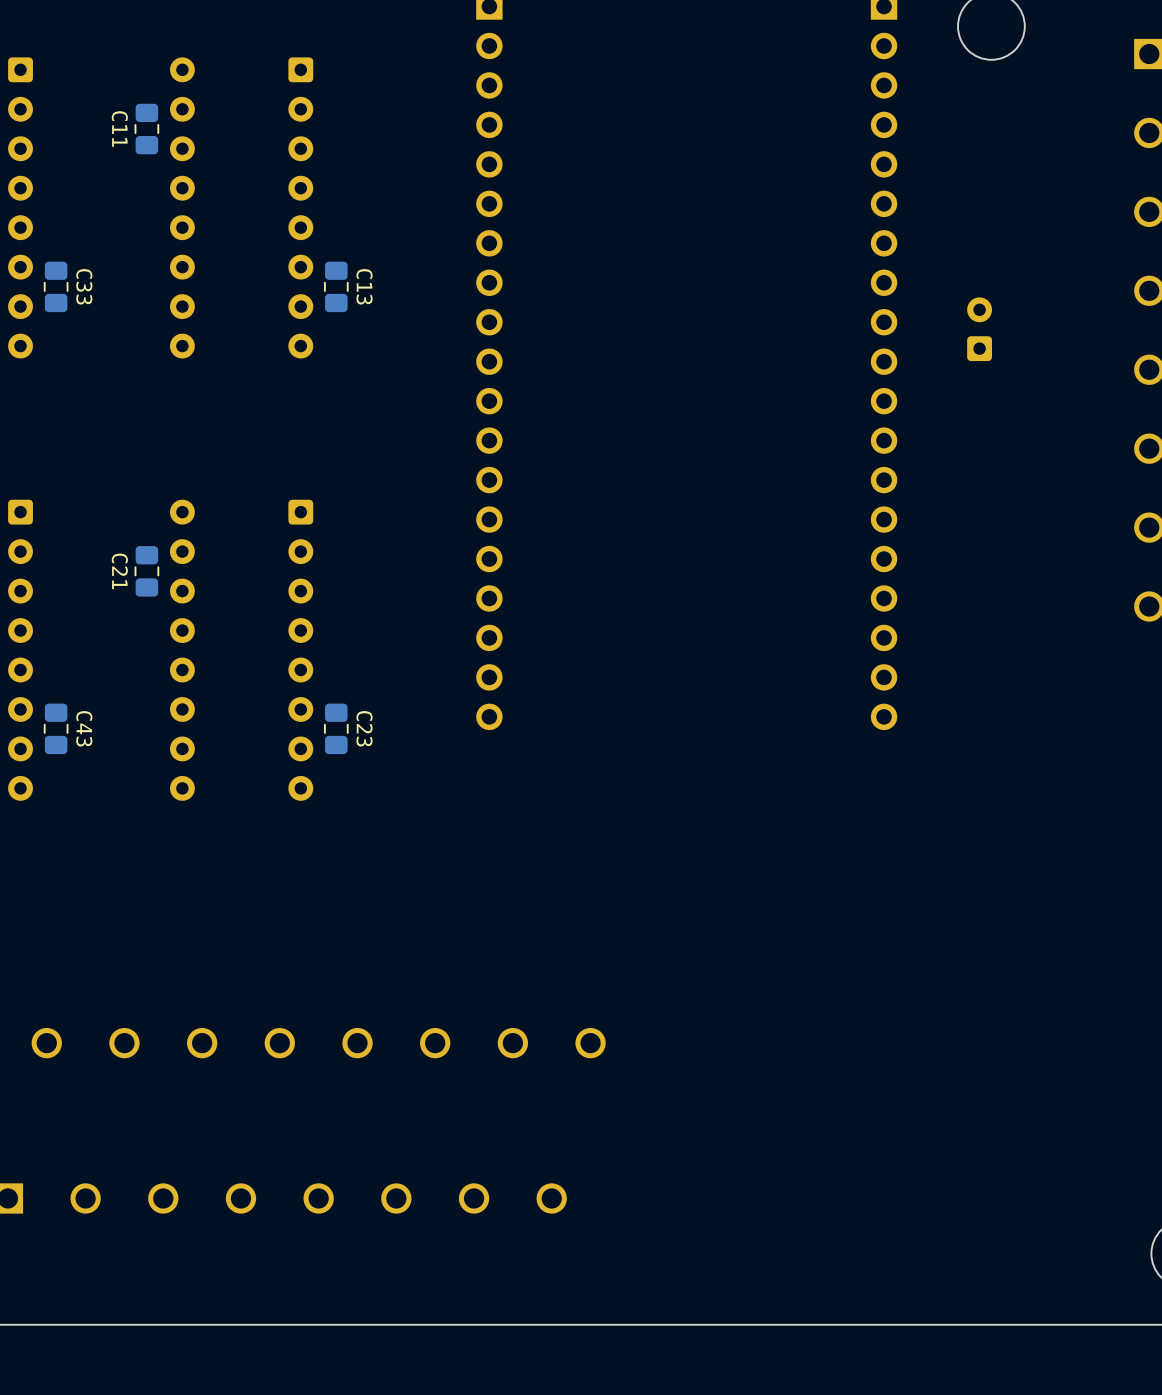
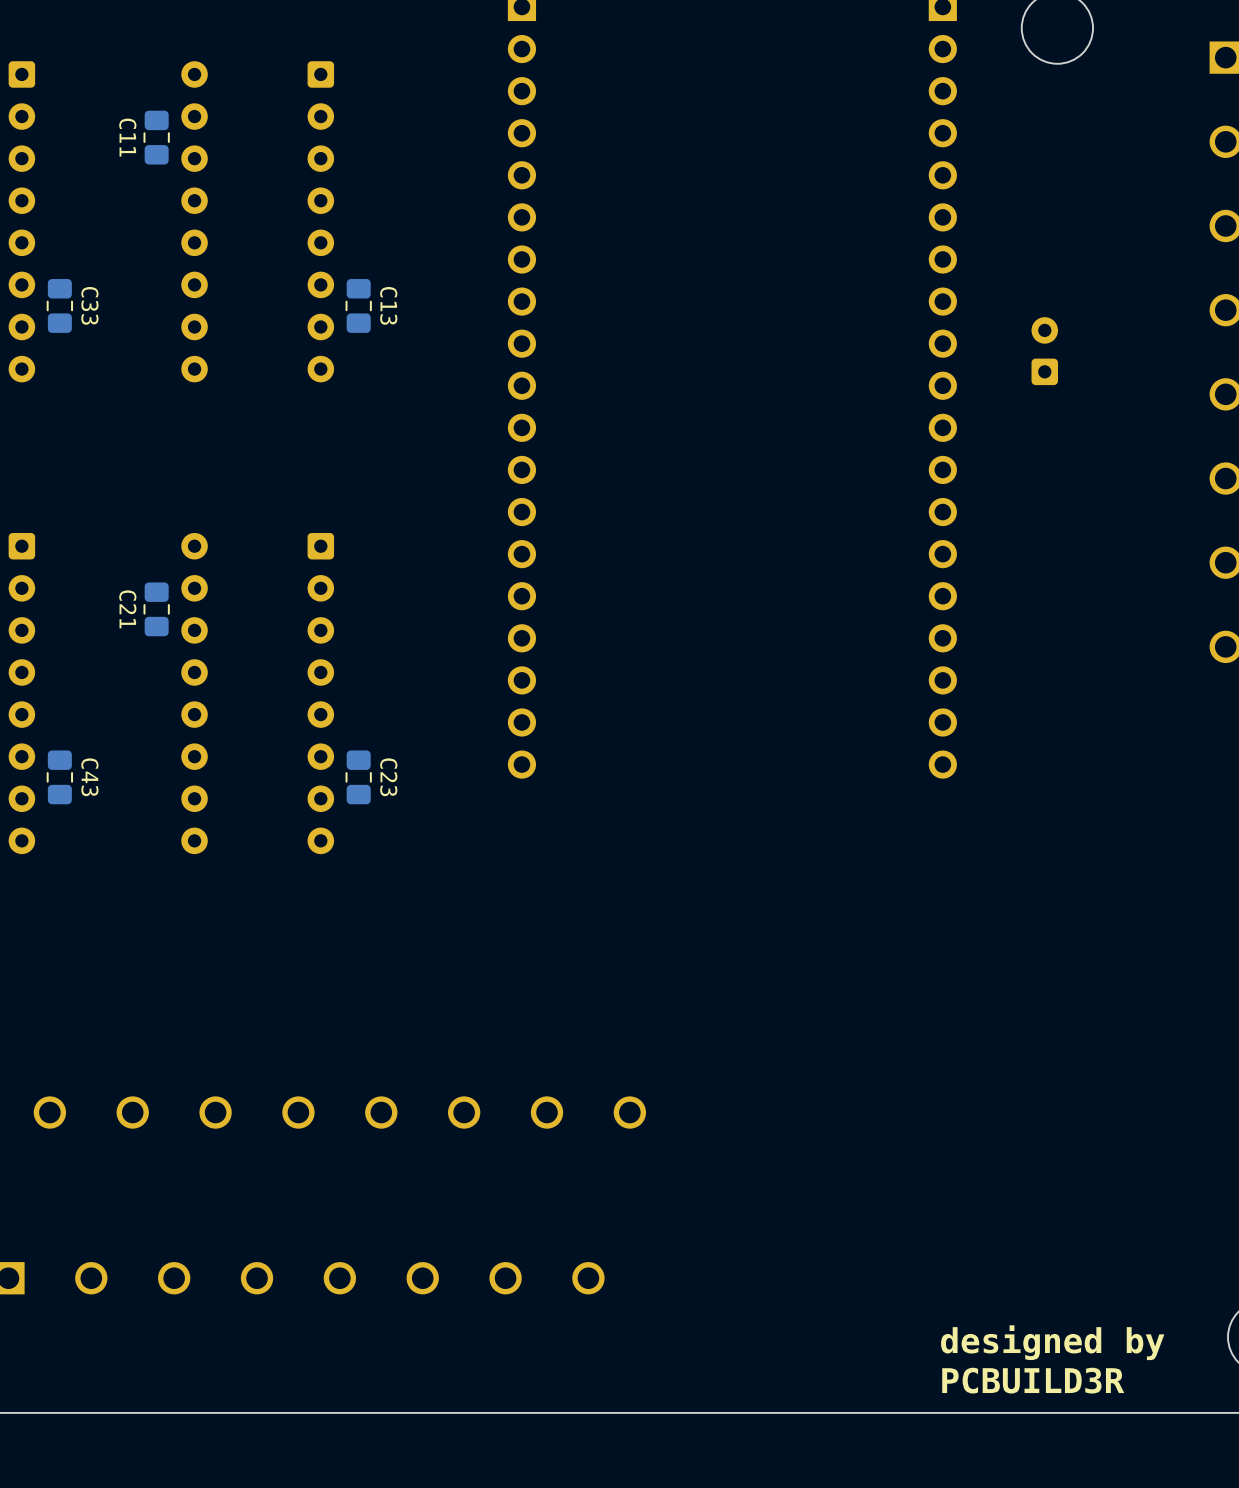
text: none -> designed by (1052, 1342)
text: none -> PCBUILD3R (1033, 1380)

